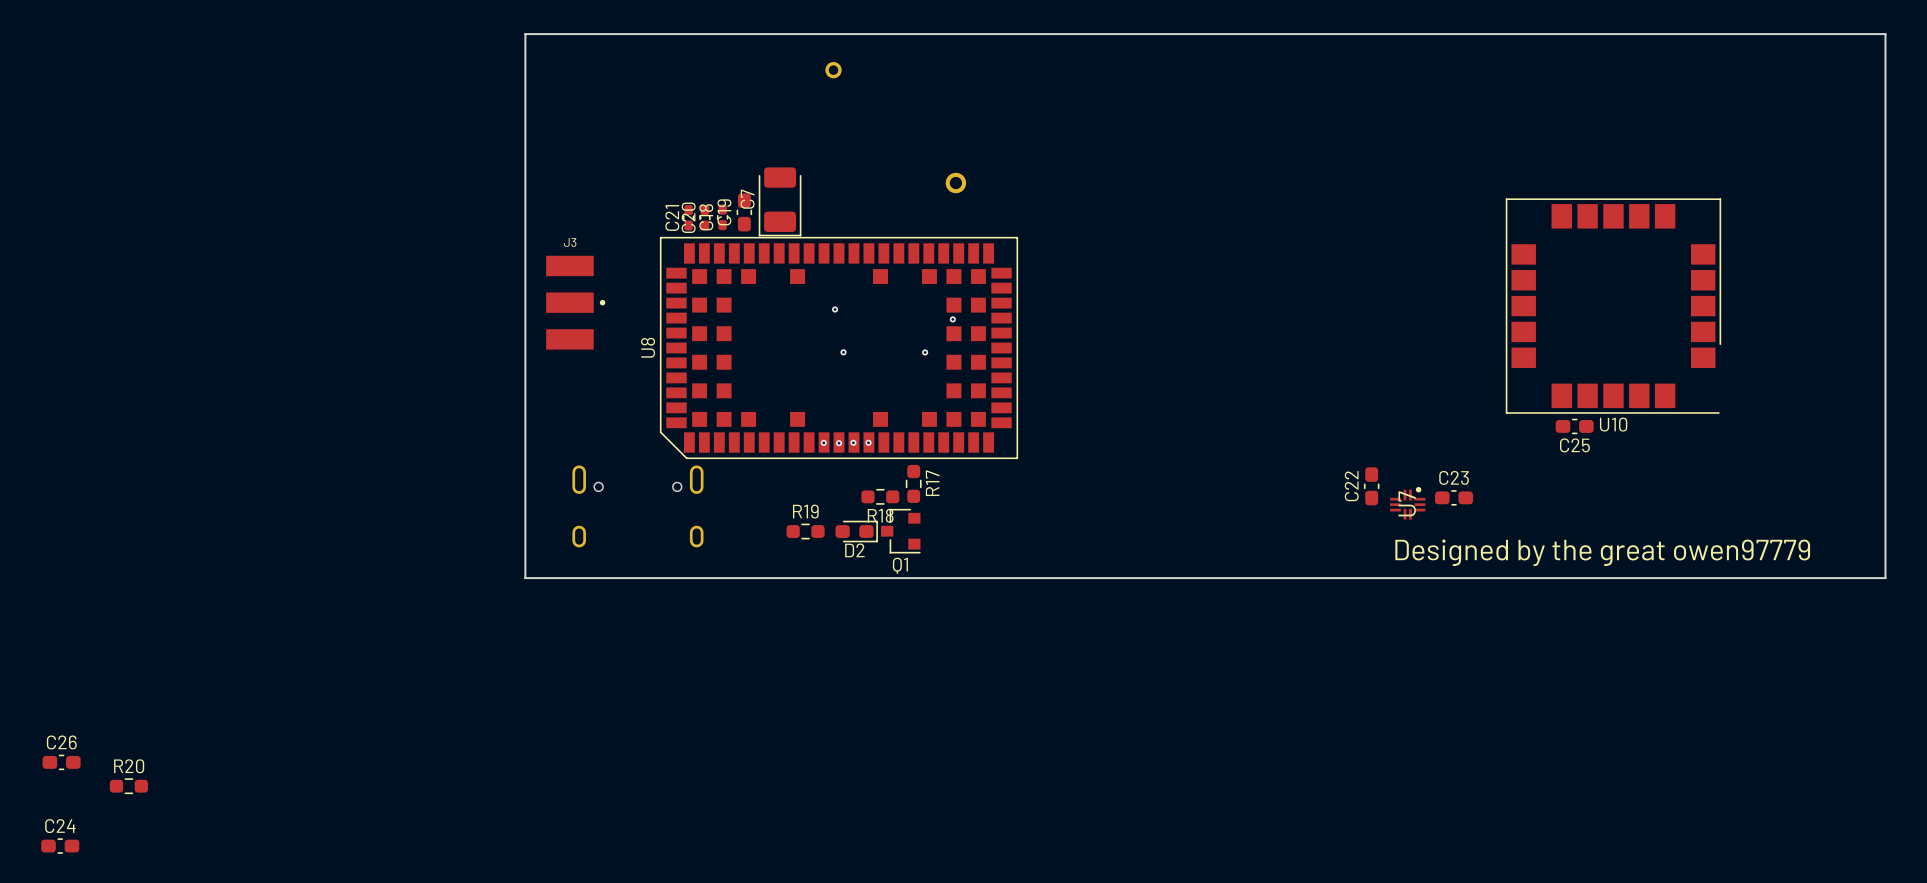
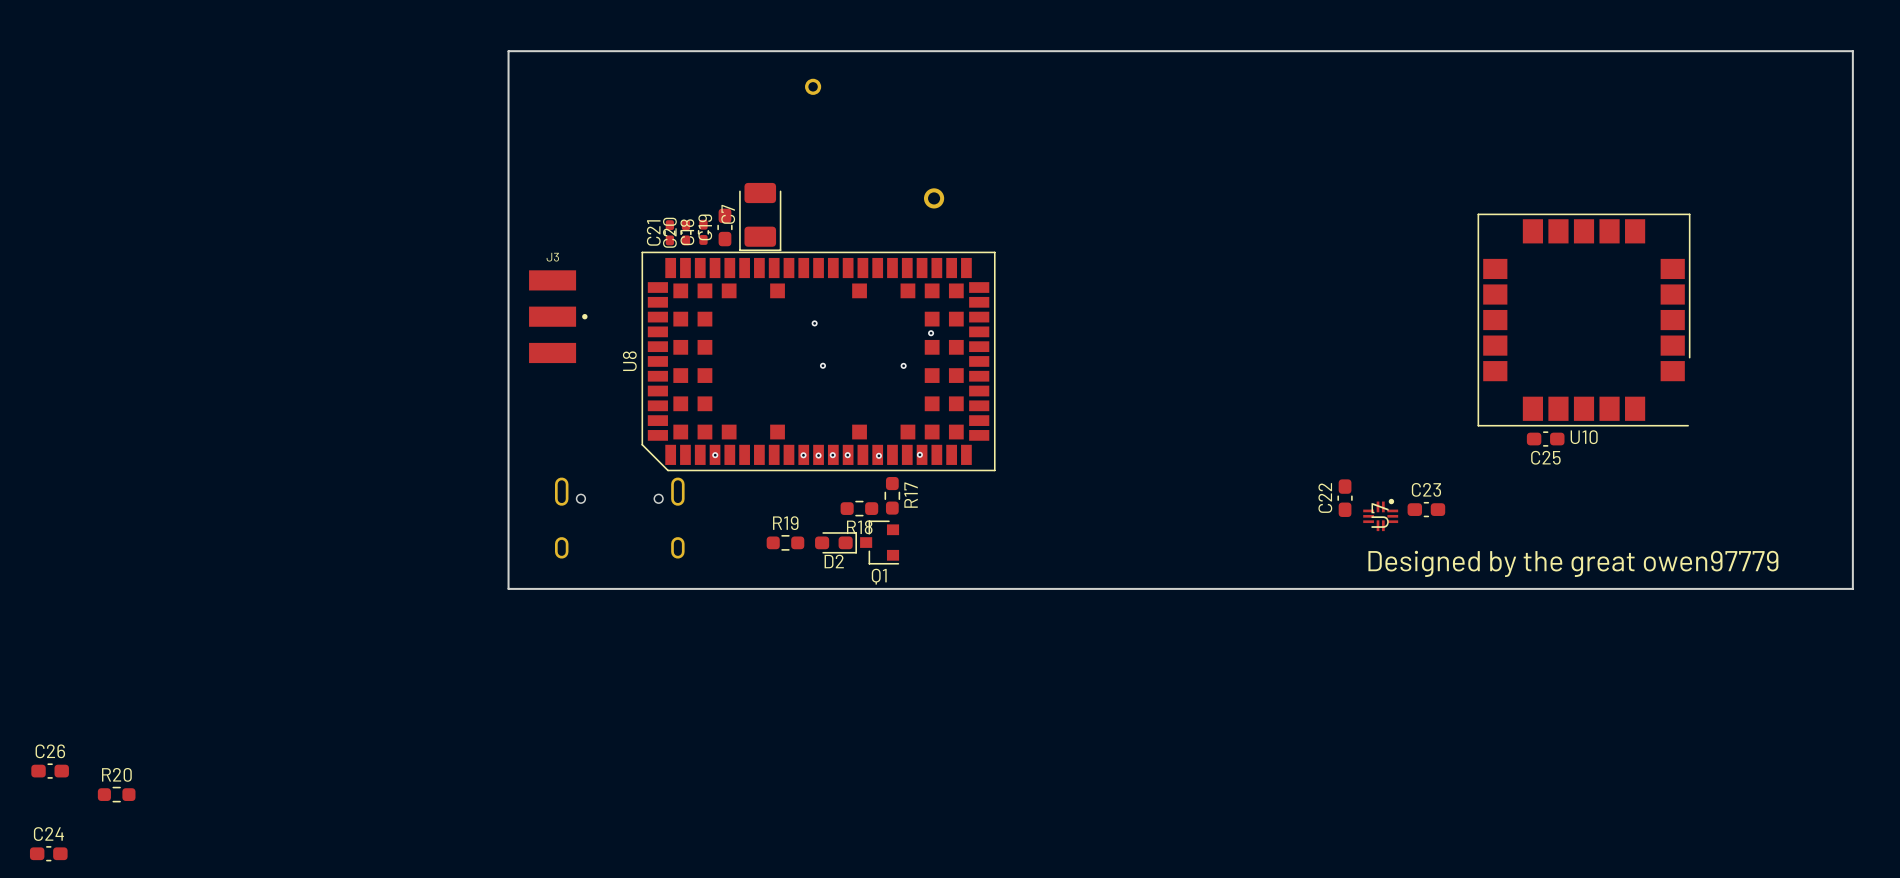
via: none -> (715, 455)
via: none -> (919, 454)
via: none -> (878, 455)

